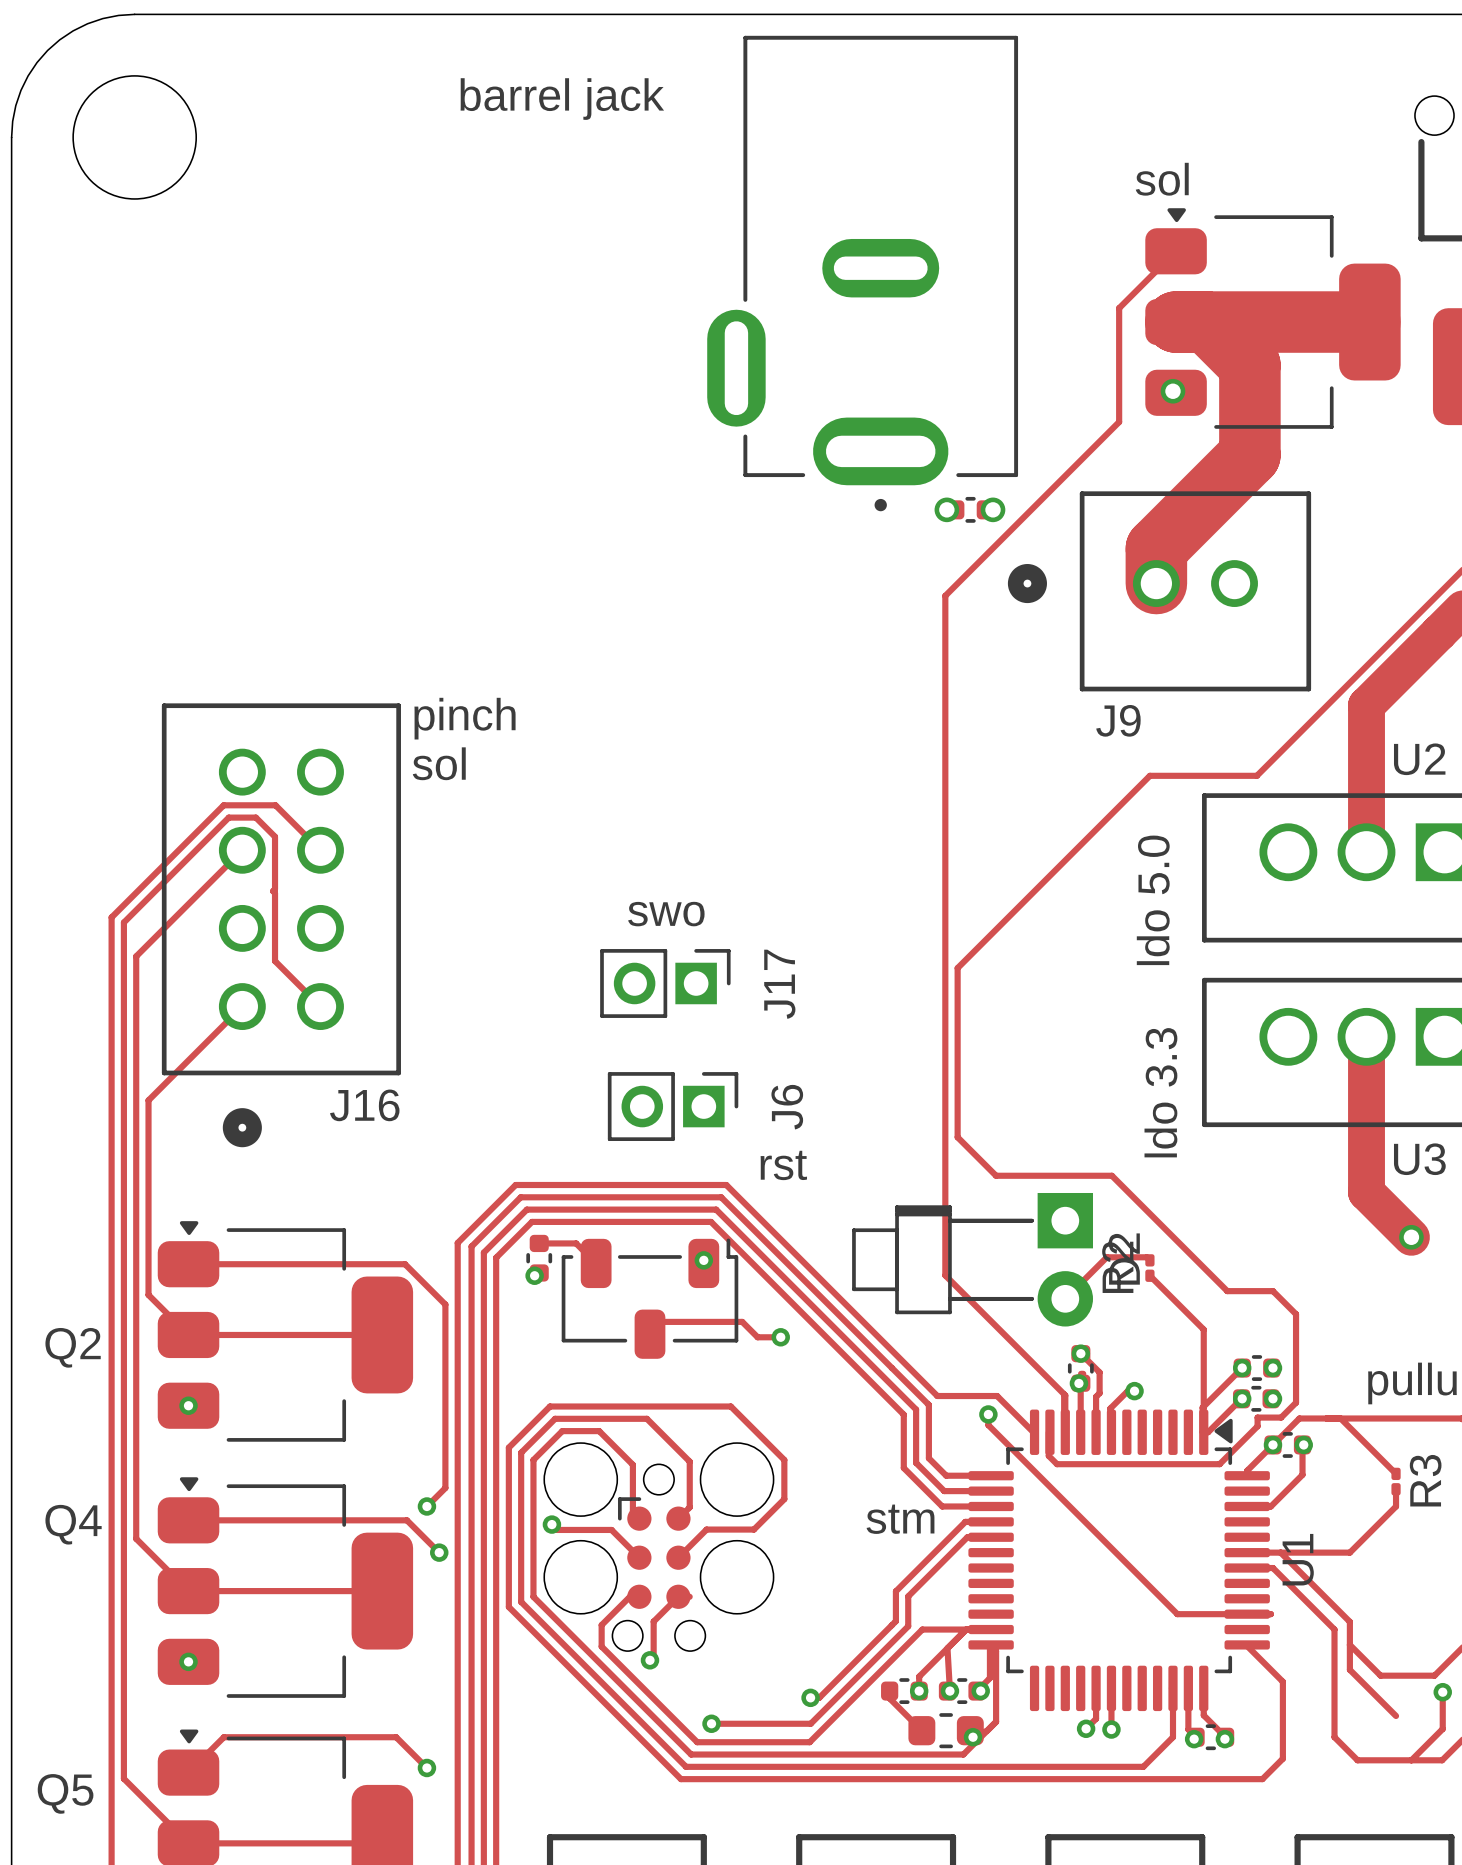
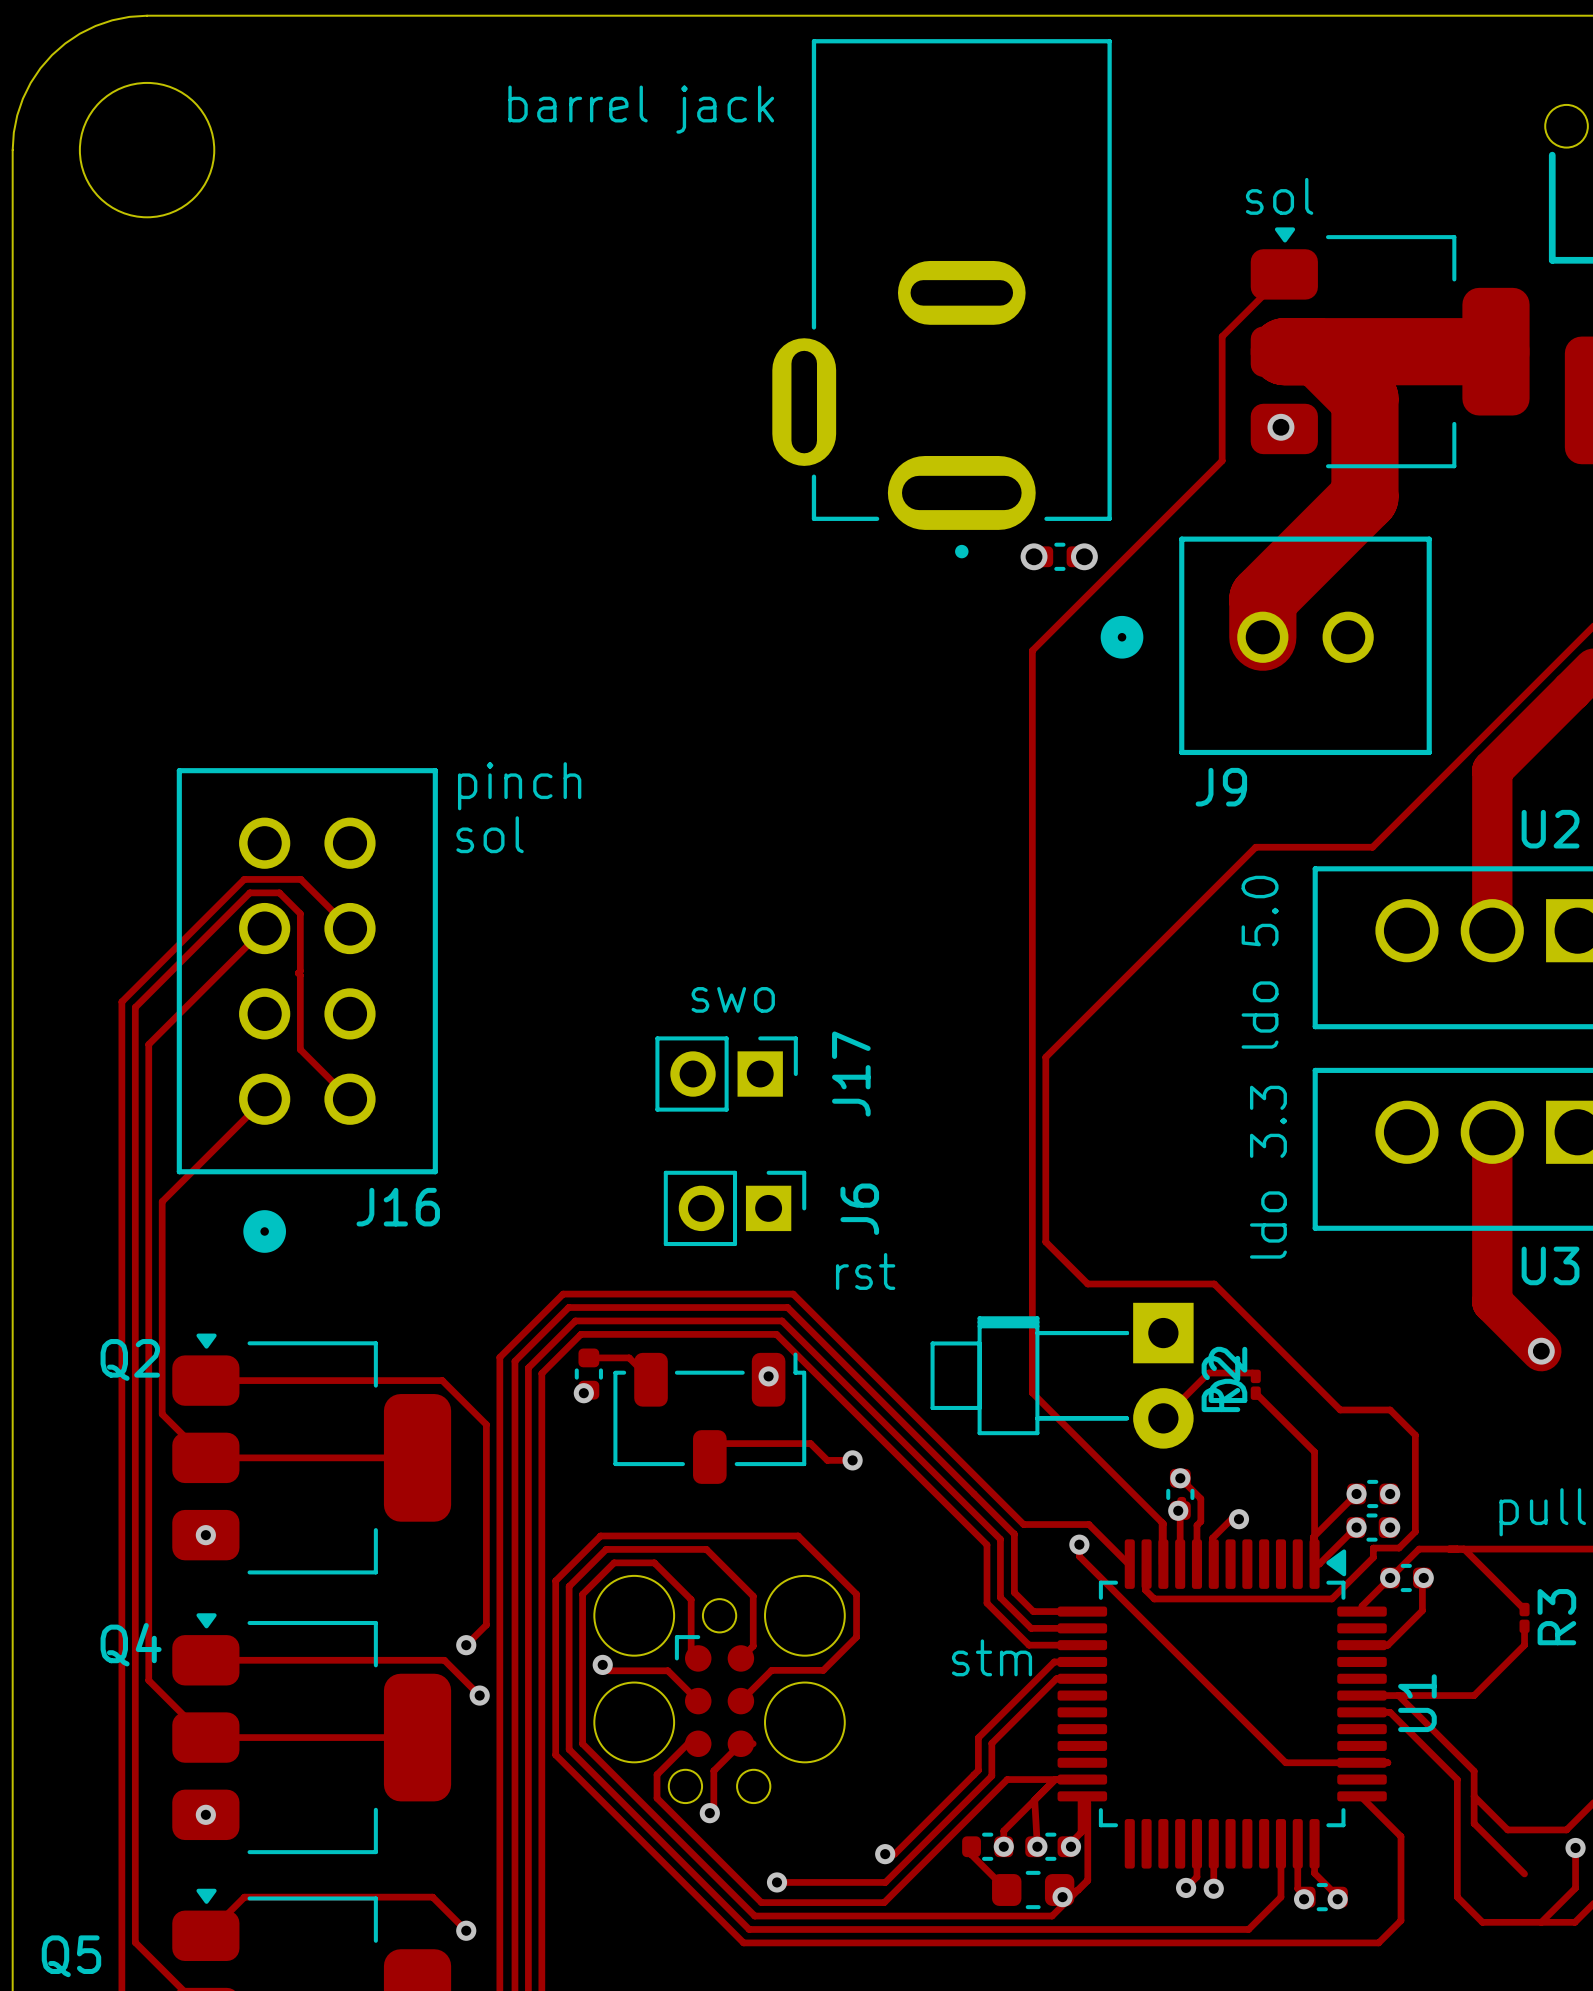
Q2 name position: Q2 (73, 1347) -> Q2 (130, 1359)
Q4 name position: Q4 (73, 1524) -> Q4 (131, 1644)

